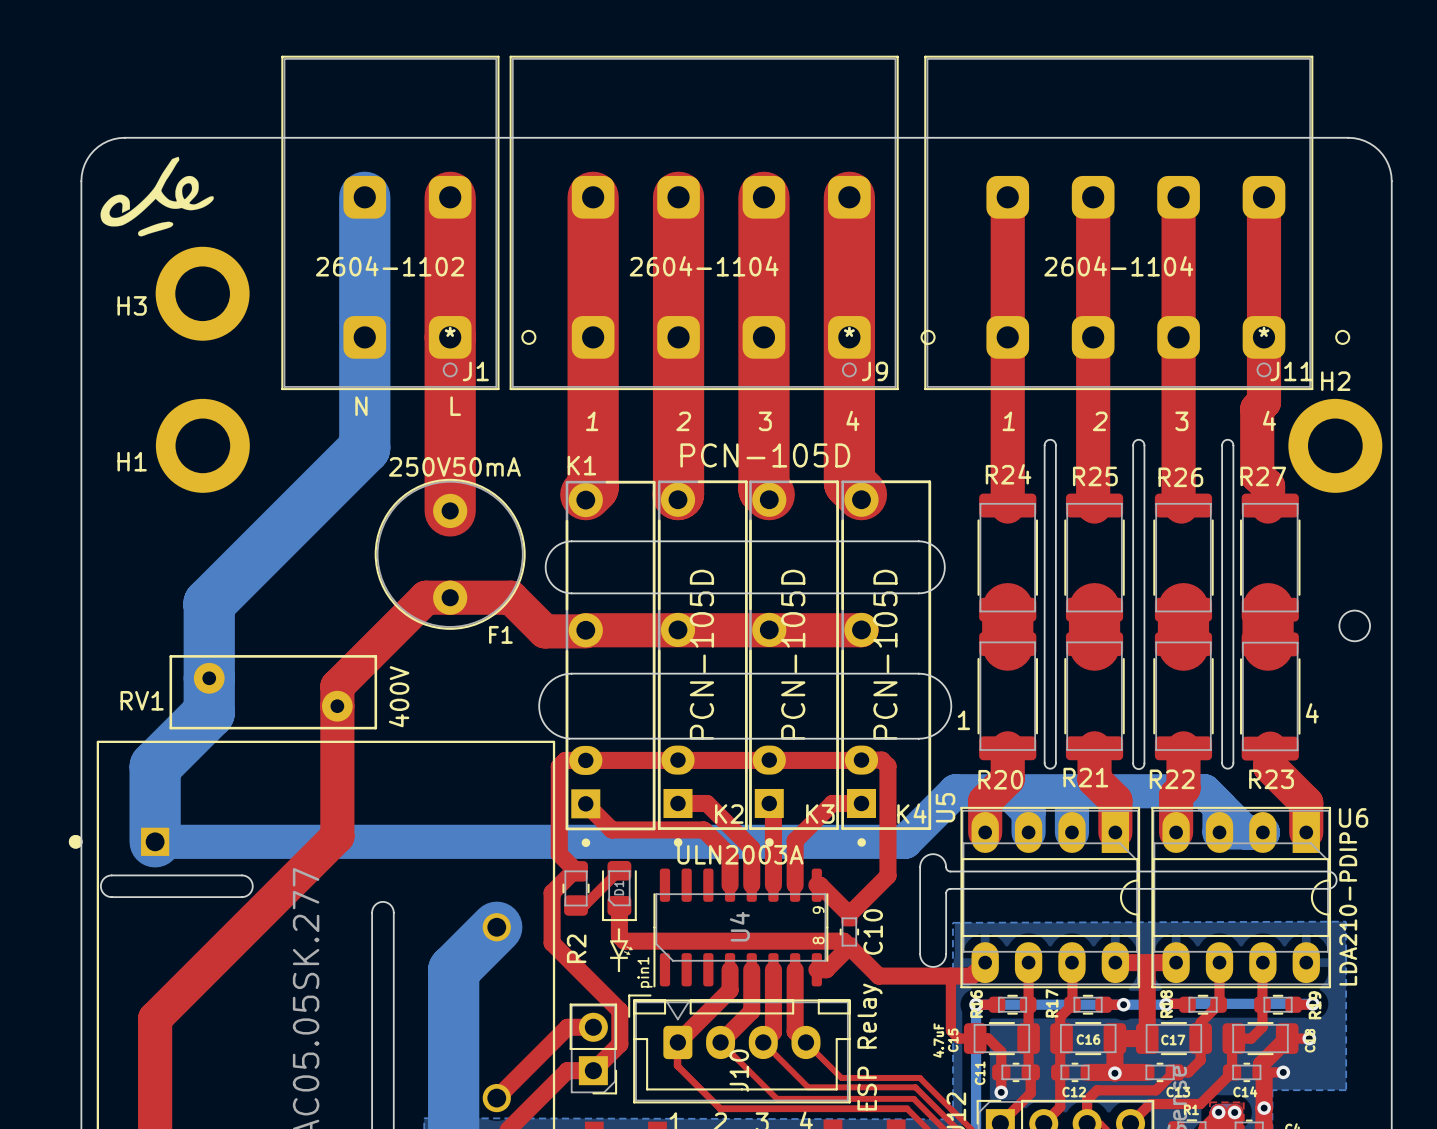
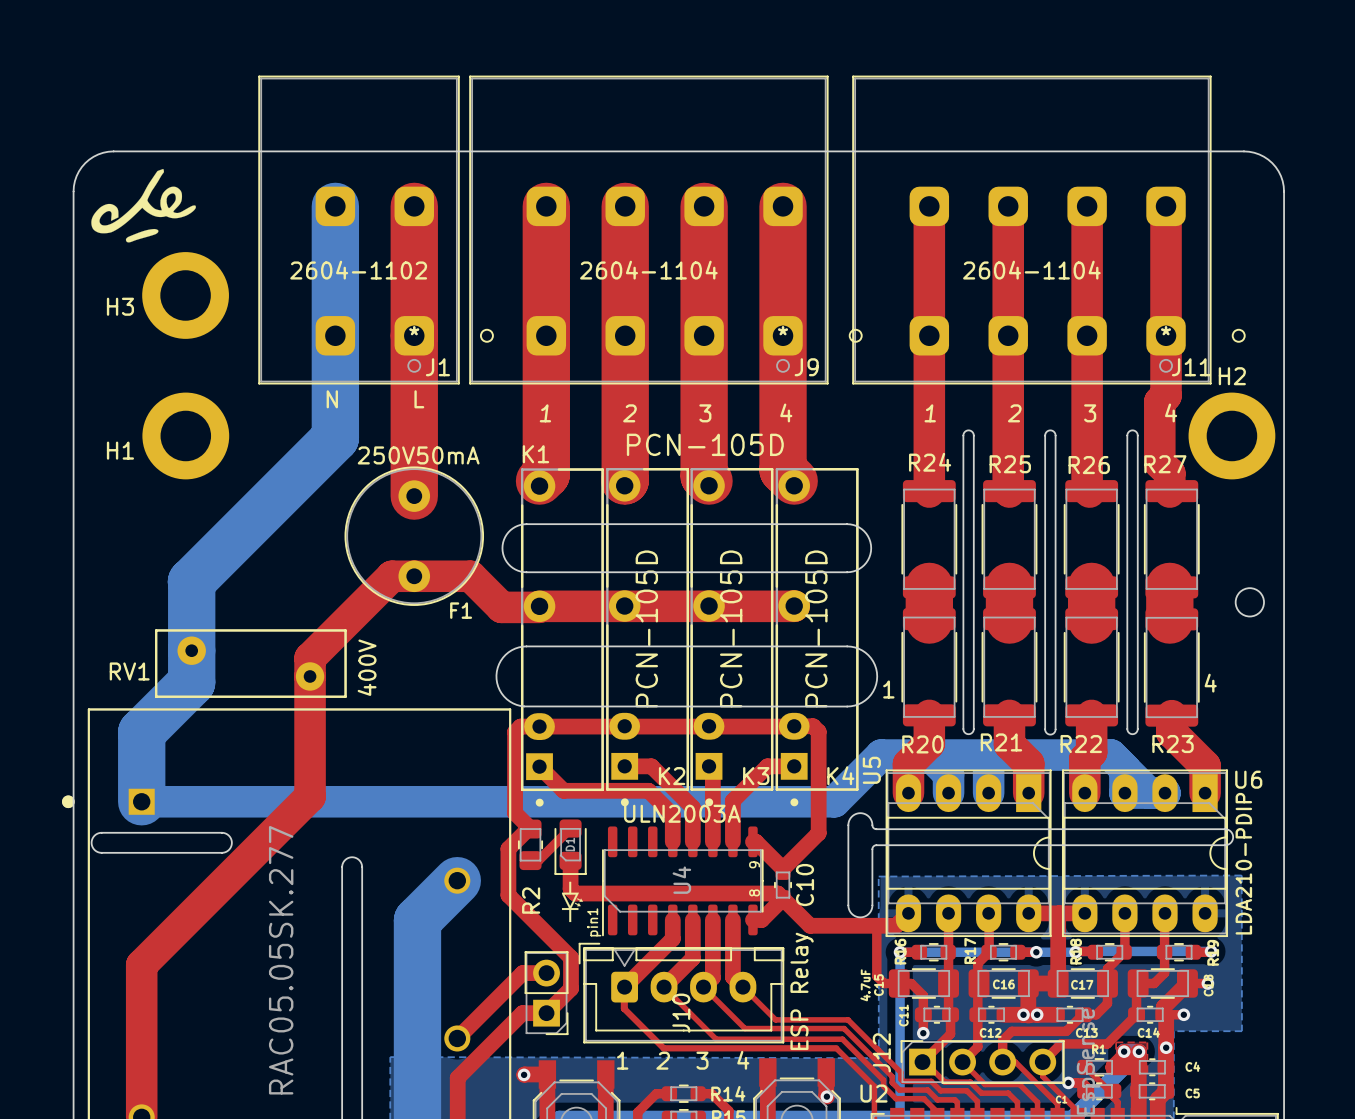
via: none -> (1023, 1014)
via: none -> (1037, 1014)
via: (1114, 1073) -> none

